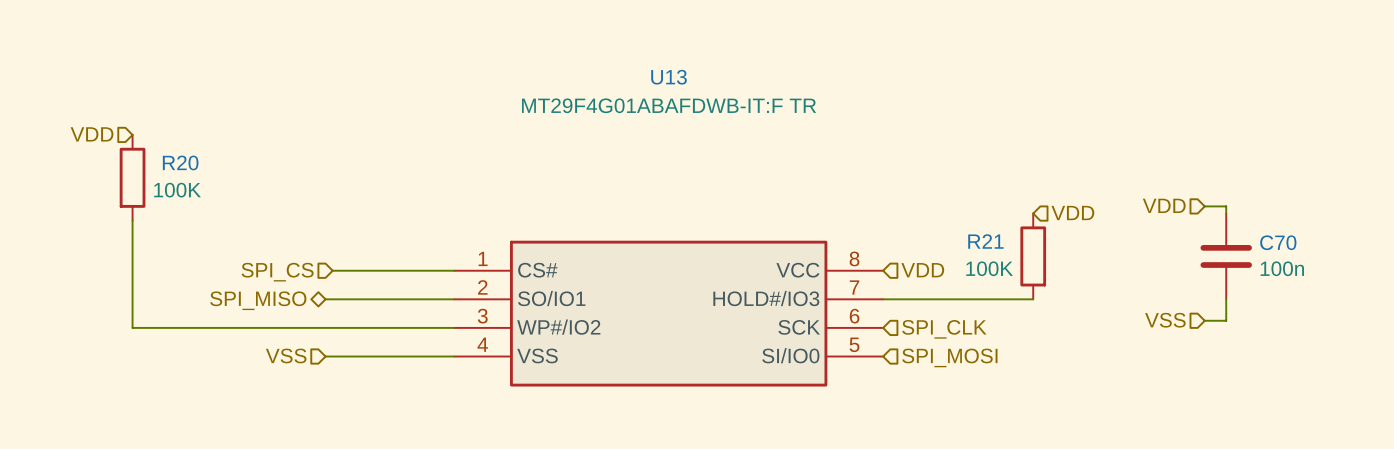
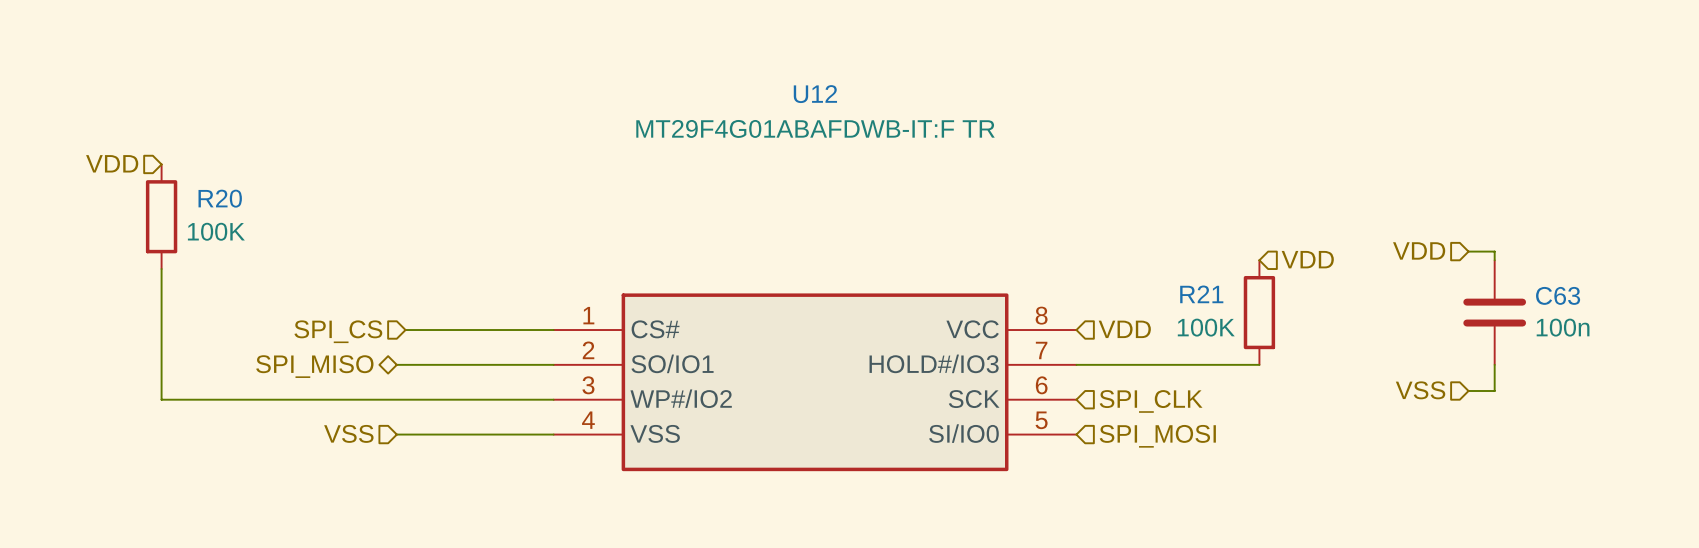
U13 name: U13 (669, 77) -> U12 (815, 94)
C70 name: C70 (1278, 242) -> C63 (1558, 295)

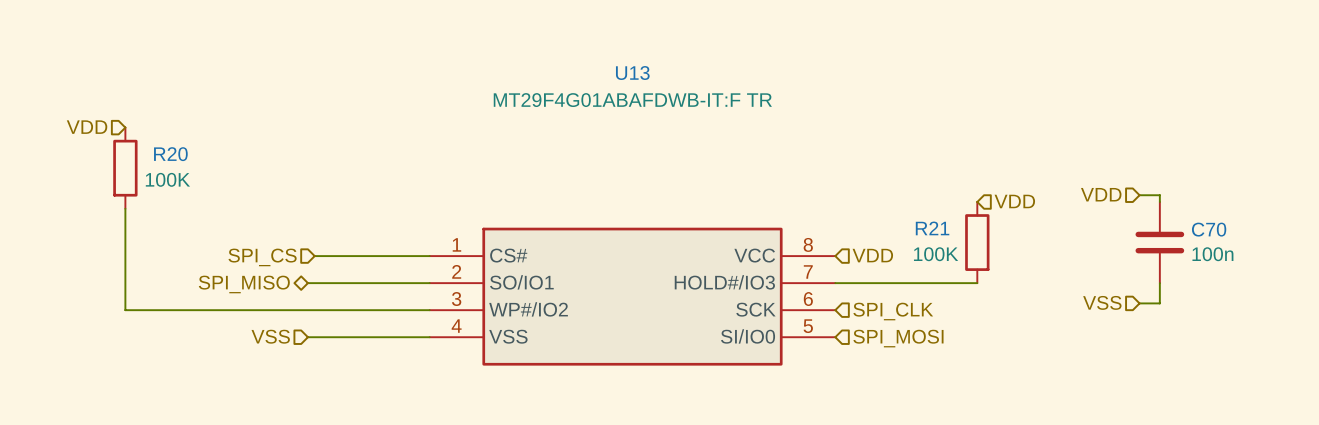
U12 name: U12 (815, 94) -> U13 (632, 73)
C63 name: C63 (1558, 295) -> C70 (1209, 229)

